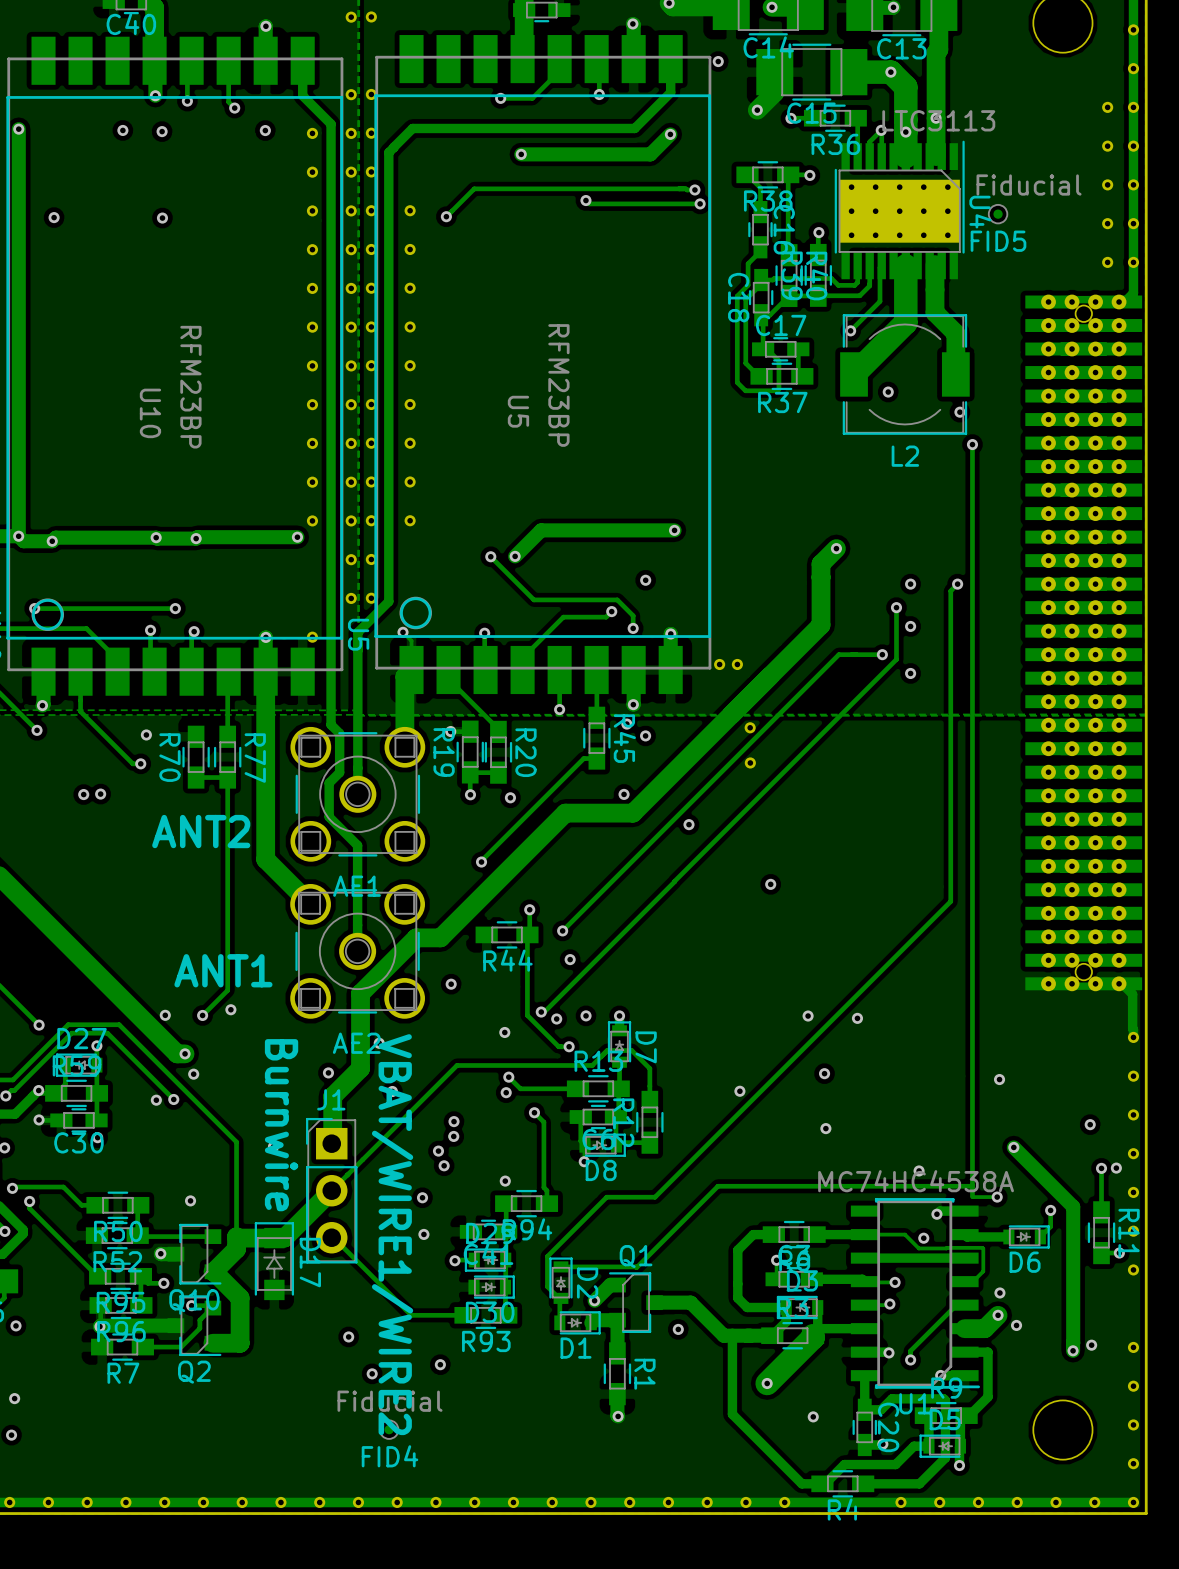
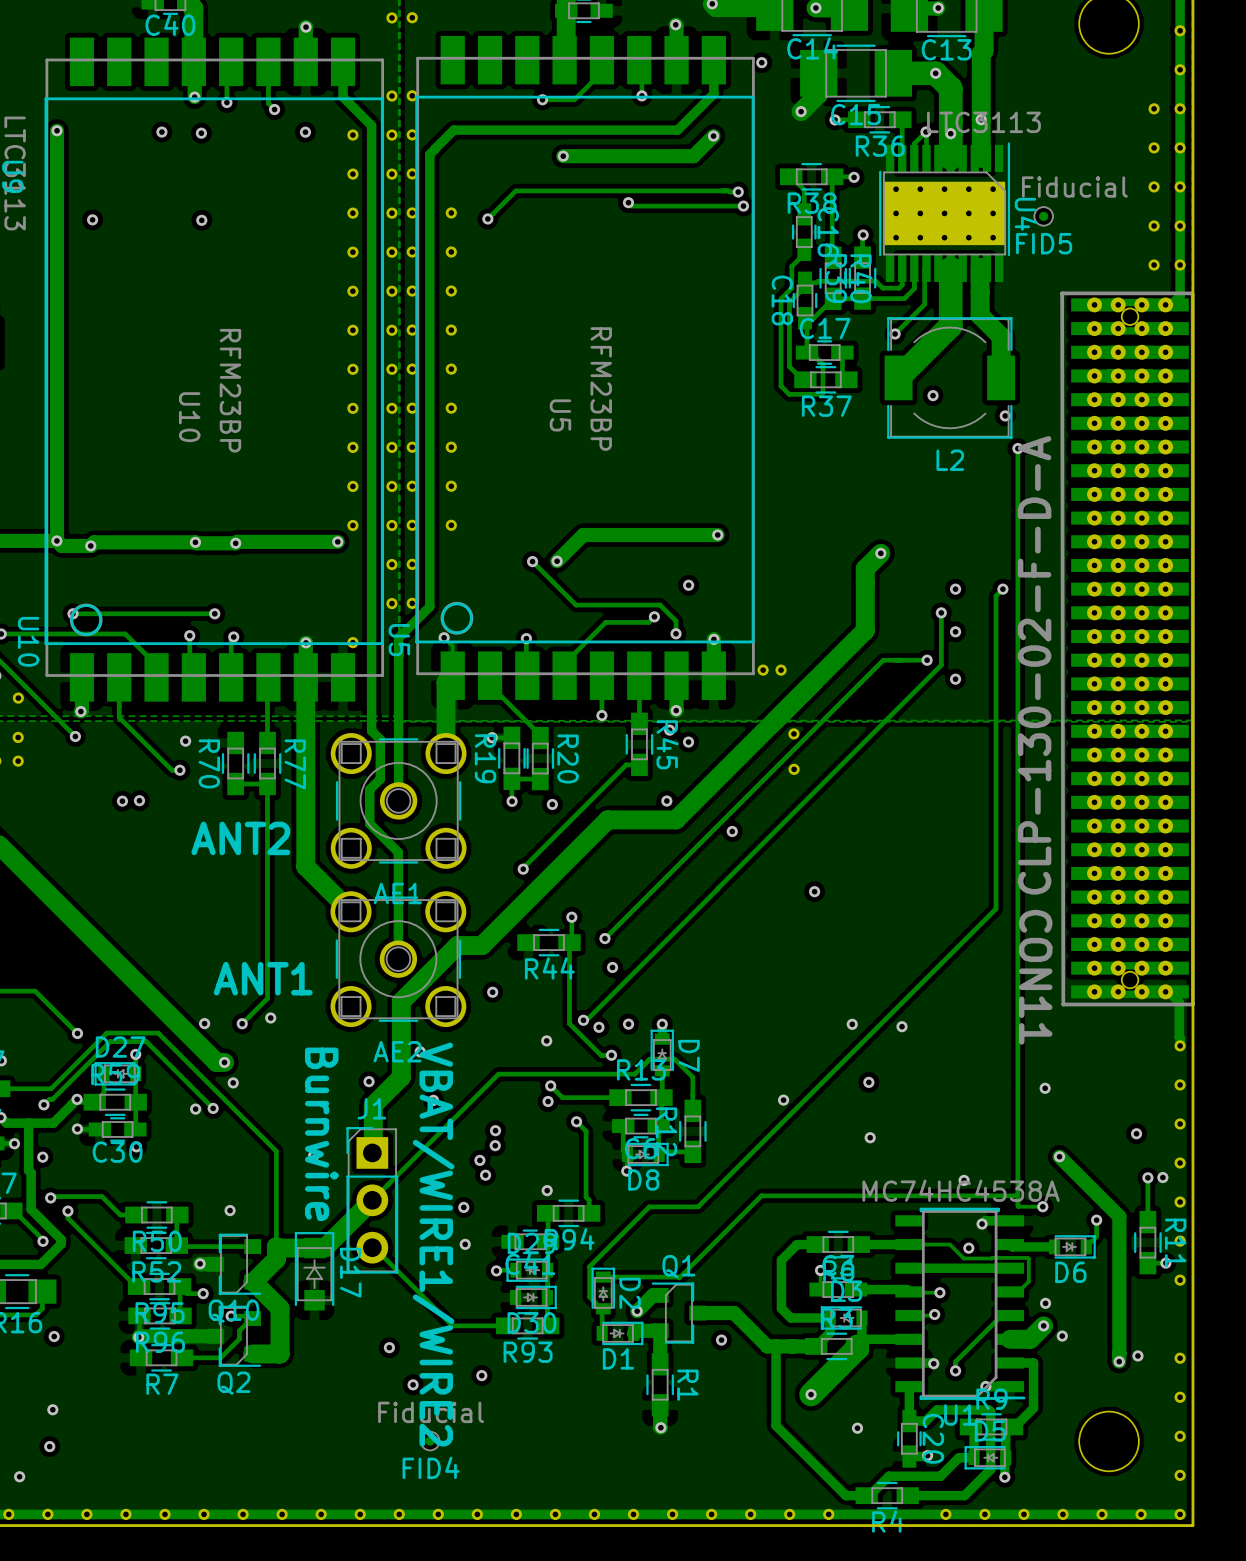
line: none -> (1192, 293) (1062, 293) (1063, 1004) (1192, 1004) (1192, 293)
text: none -> CLP-130-02-F-D-A (1034, 665)
text: none -> CON11 (1035, 977)

